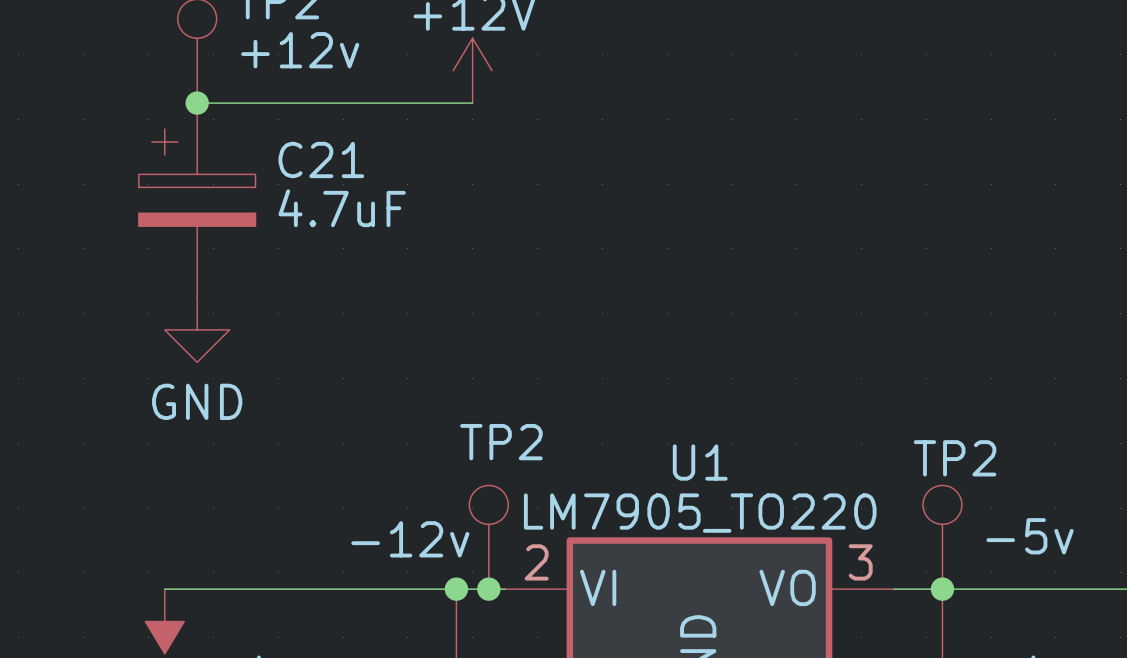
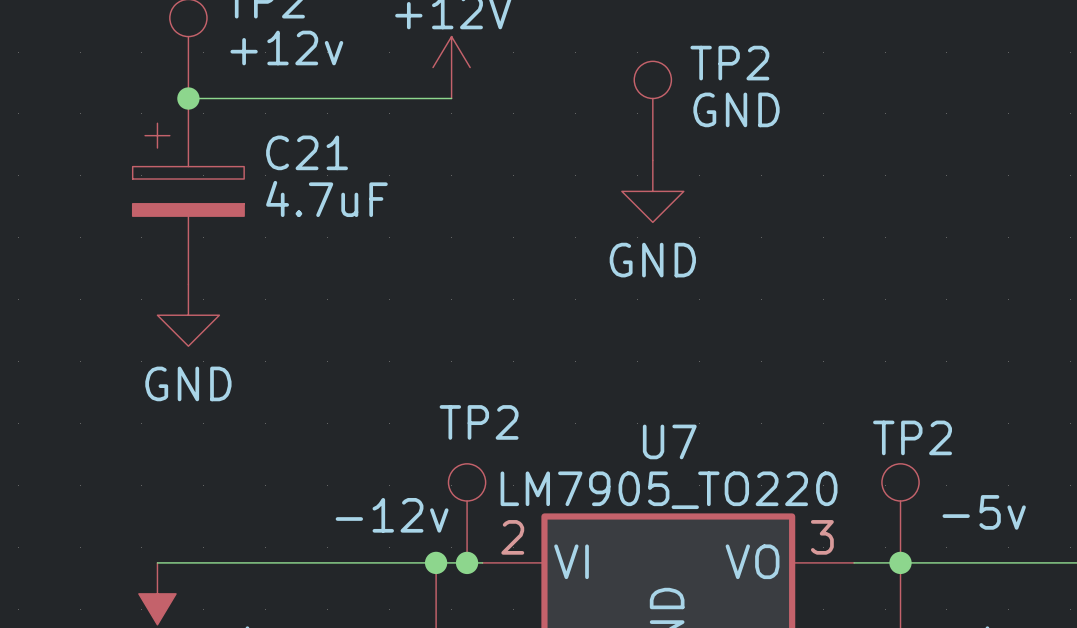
TP2: none -> GND (652, 110)
power symbol: none -> GND (652, 191)
U1 name: U1 (700, 462) -> U7 (669, 441)

